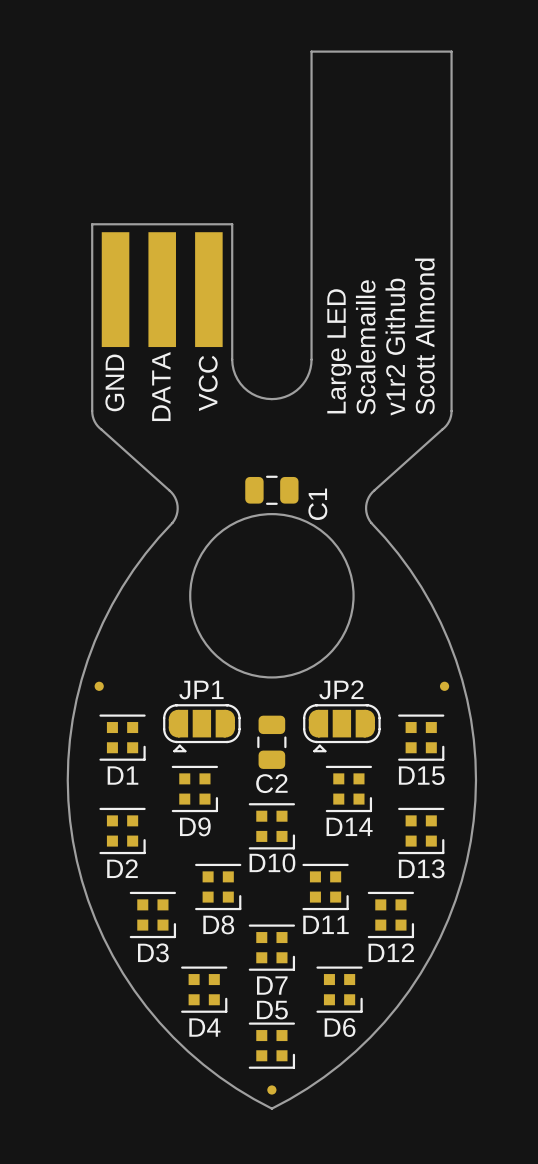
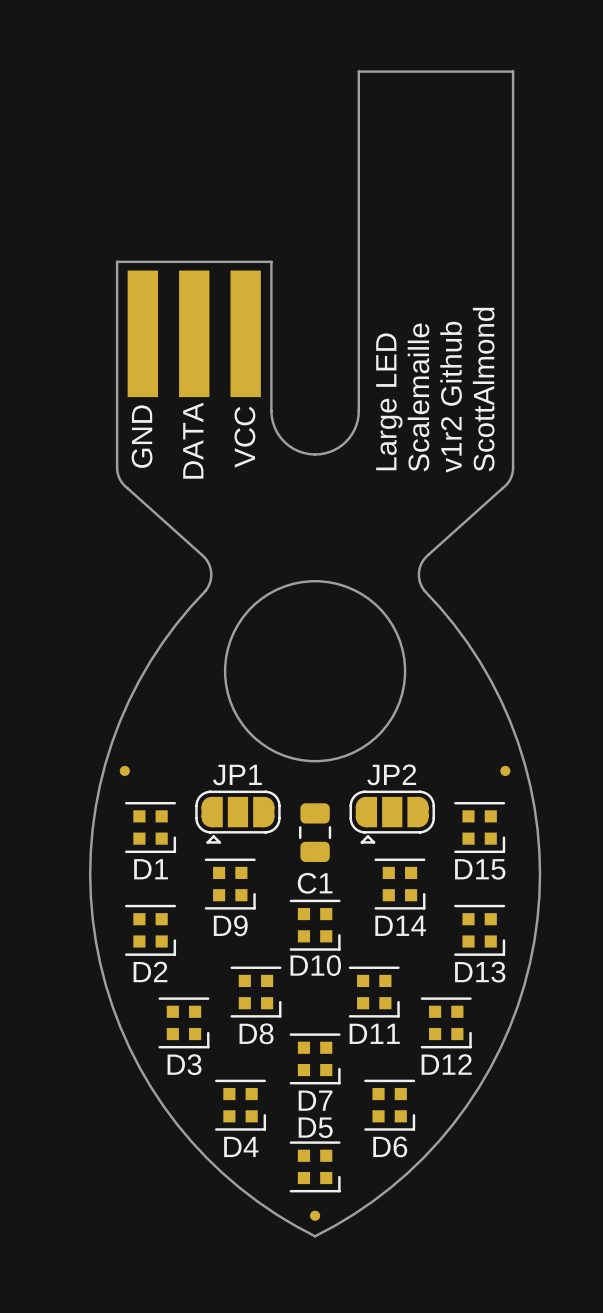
text: Scott Almond (424, 336) -> ScottAlmond (483, 389)
C1: (271, 490) -> none
C2 name: C2 (271, 783) -> C1 (315, 883)

